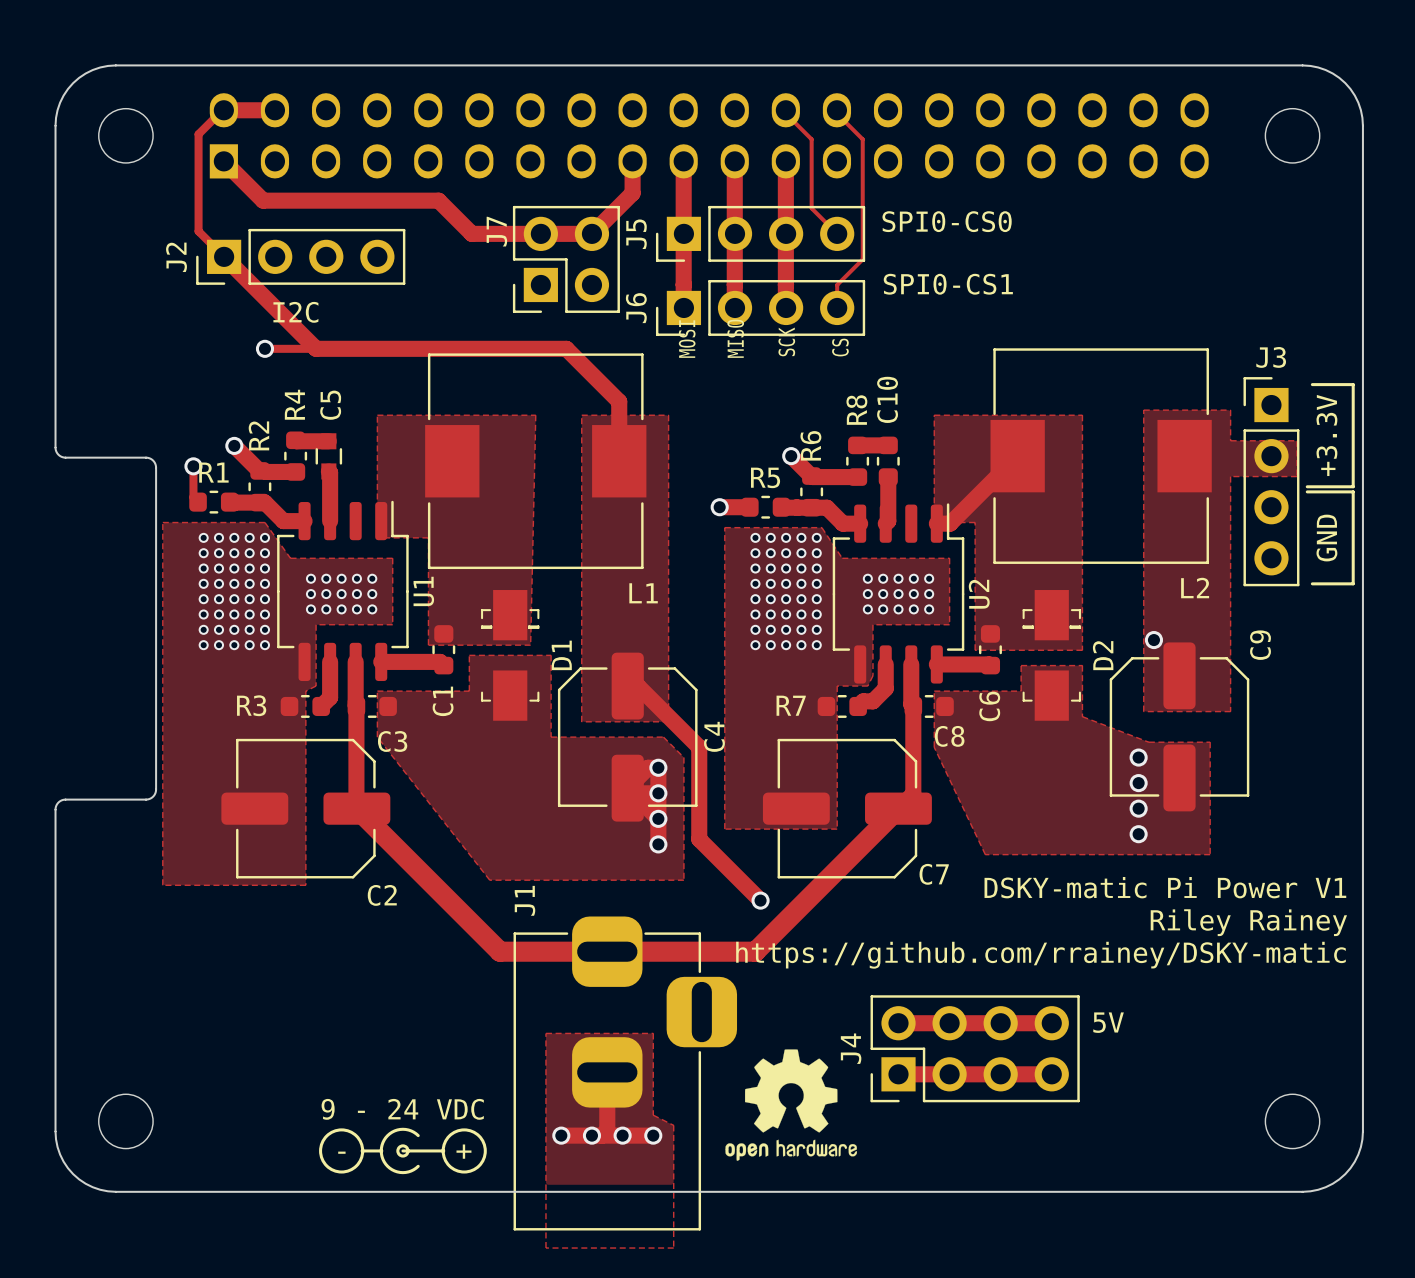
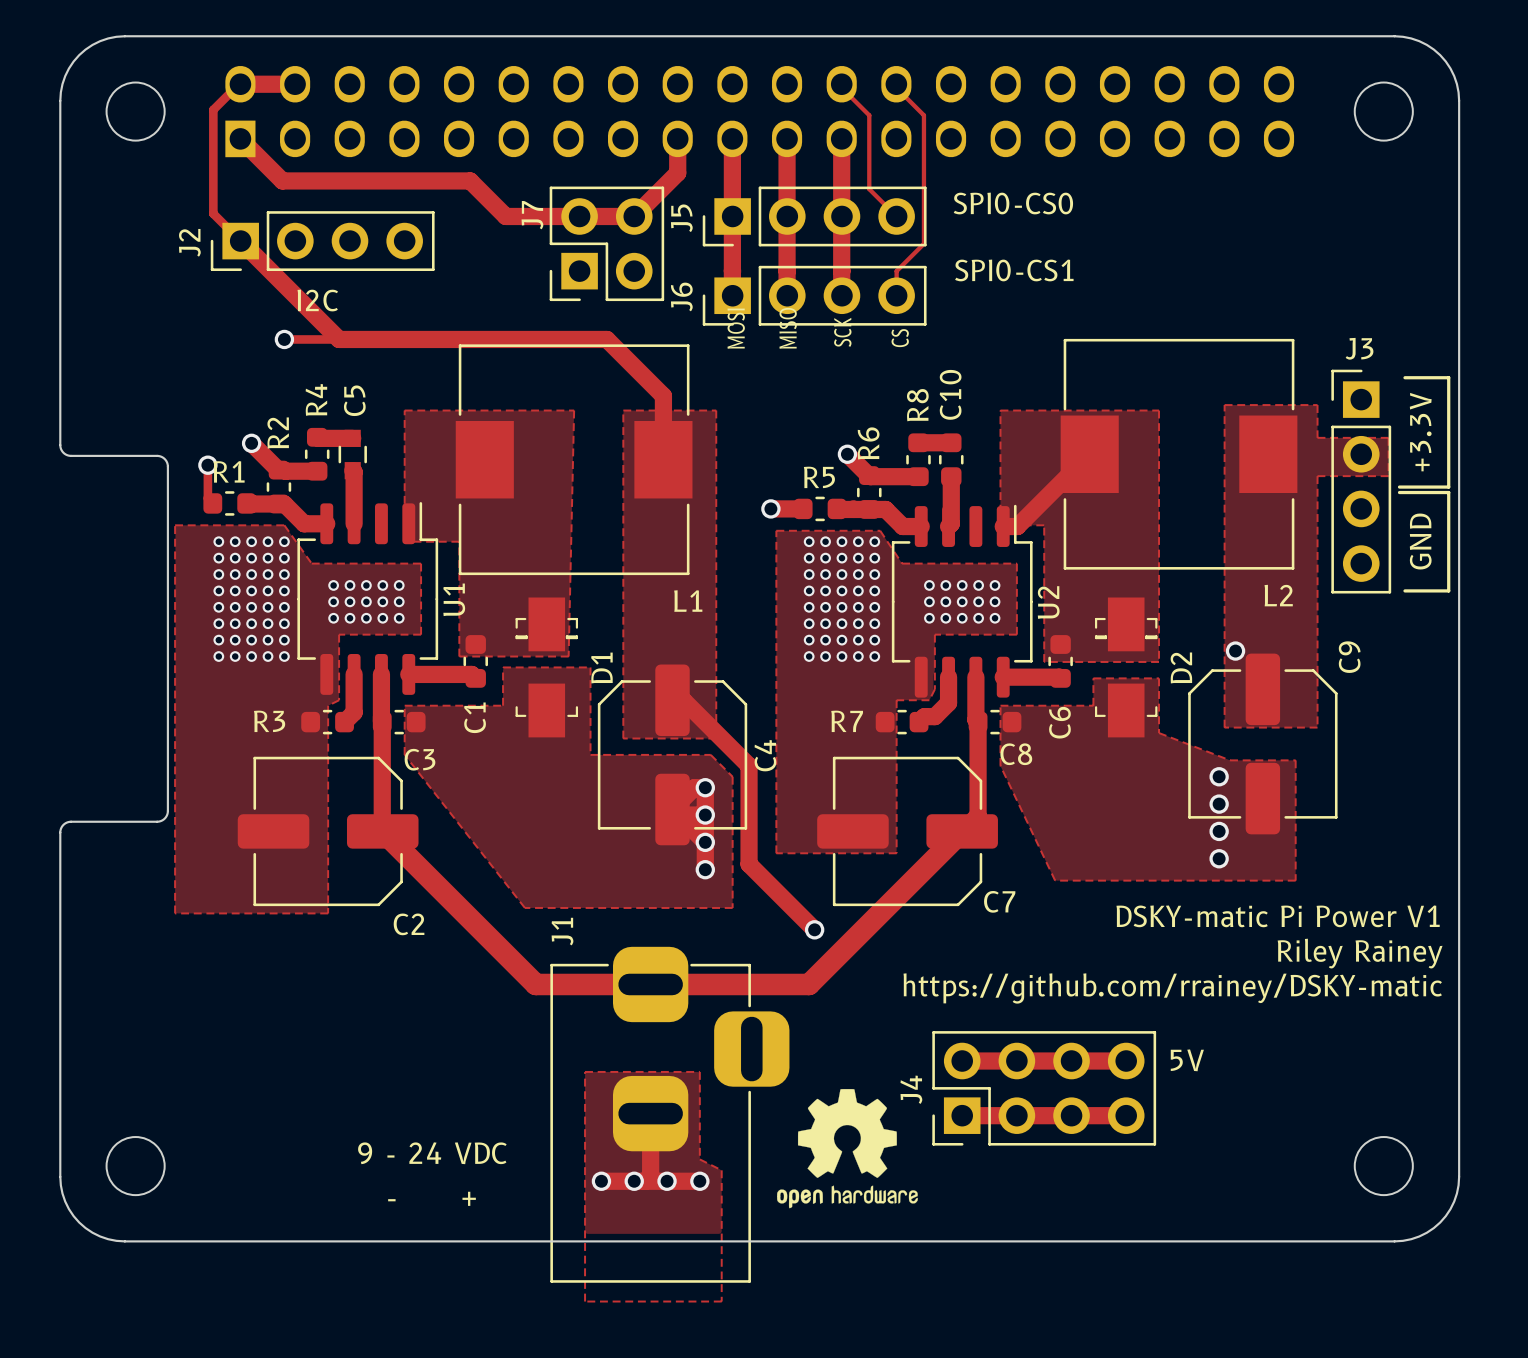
drawing: [319, 1128, 365, 1174] -> none
drawing: [441, 1128, 487, 1174] -> none
line: (418, 1135) (408, 1130) (394, 1130) (385, 1137) (381, 1150) (385, 1164) (394, 1170) (408, 1171) (418, 1166) -> none
drawing: [396, 1144, 410, 1158] -> none
line: (362, 1150) (381, 1150) -> none
line: (402, 1150) (443, 1150) -> none

